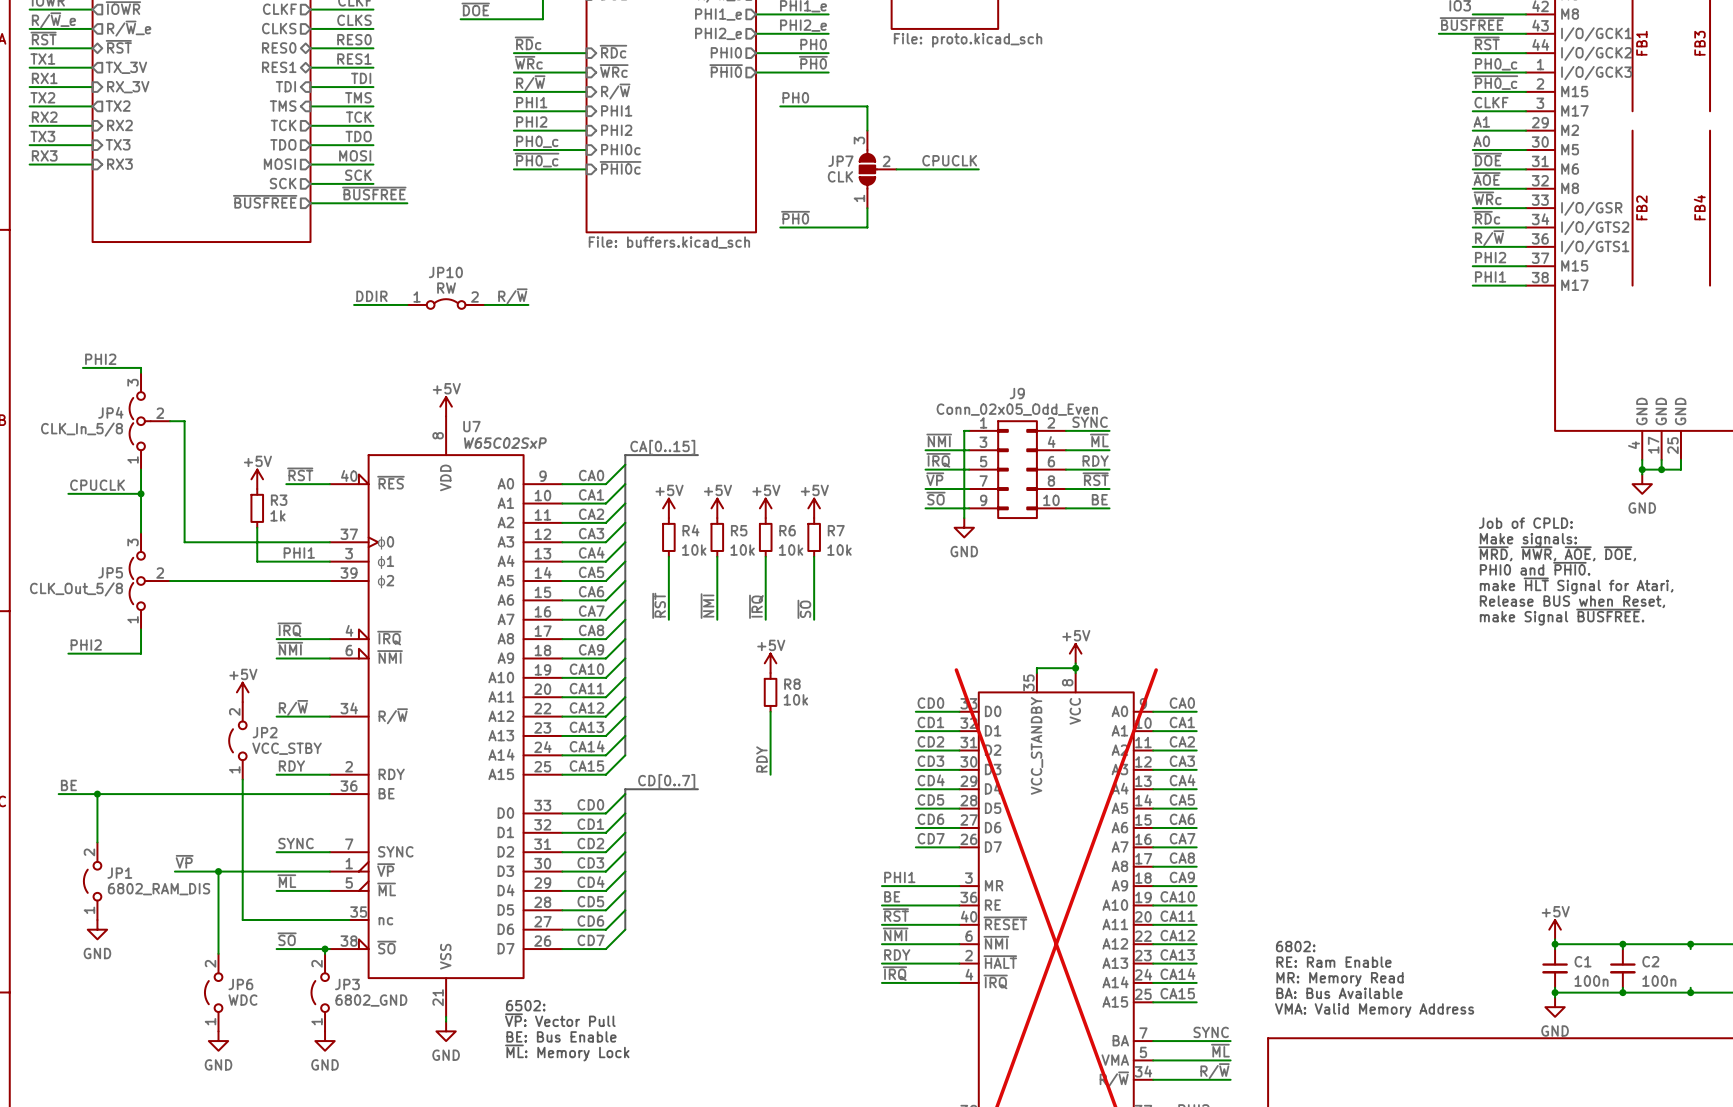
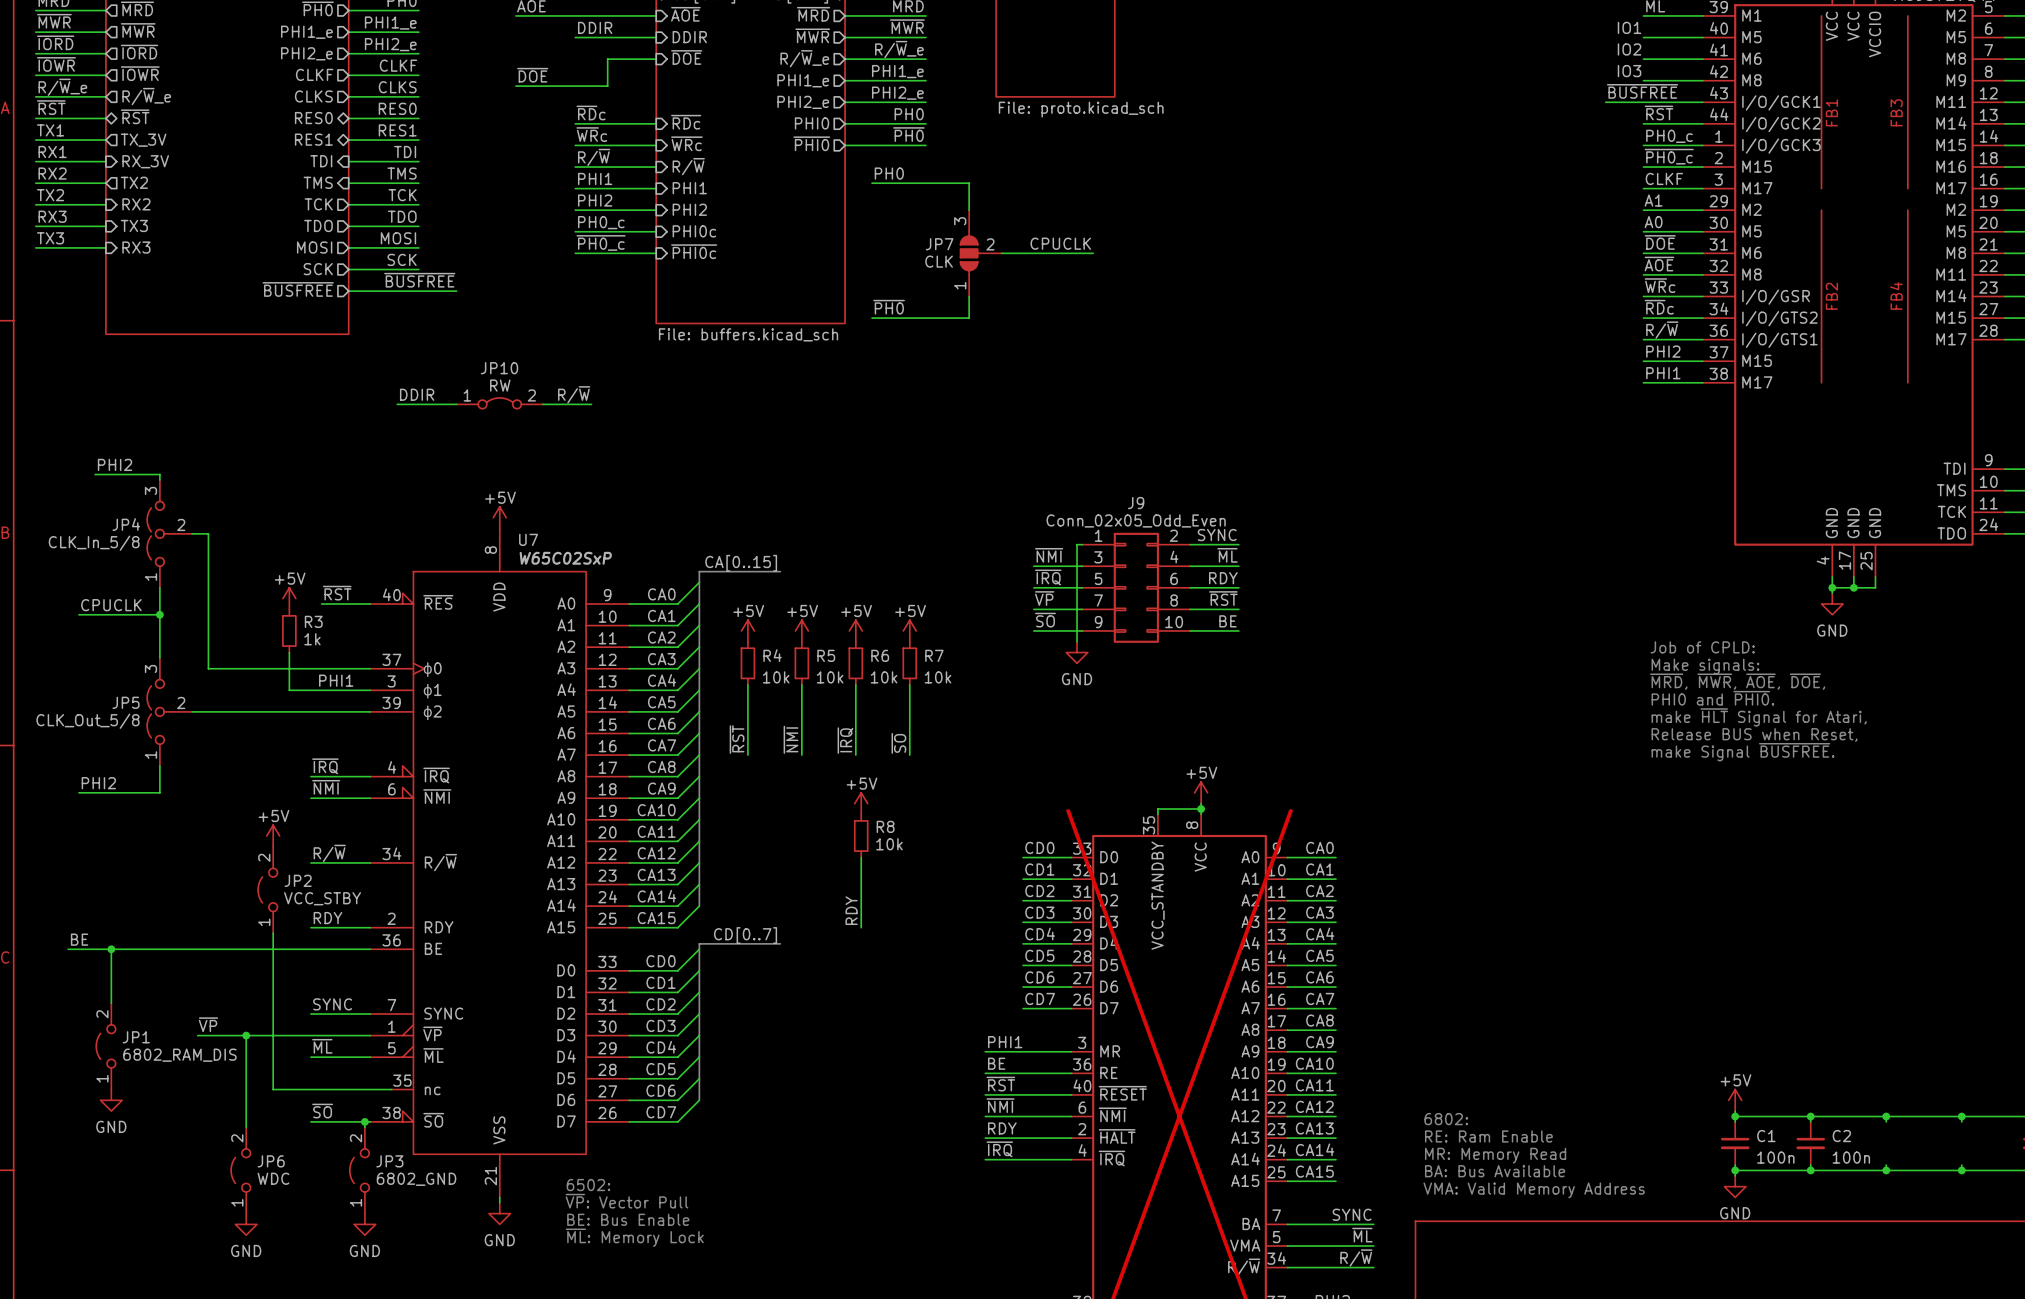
label: TX2 (42, 97) -> RX2 (52, 173)
label: RX2 (44, 117) -> TX2 (50, 195)
label: TX3 (42, 136) -> RX3 (52, 216)
label: RX3 (44, 155) -> TX3 (50, 238)

